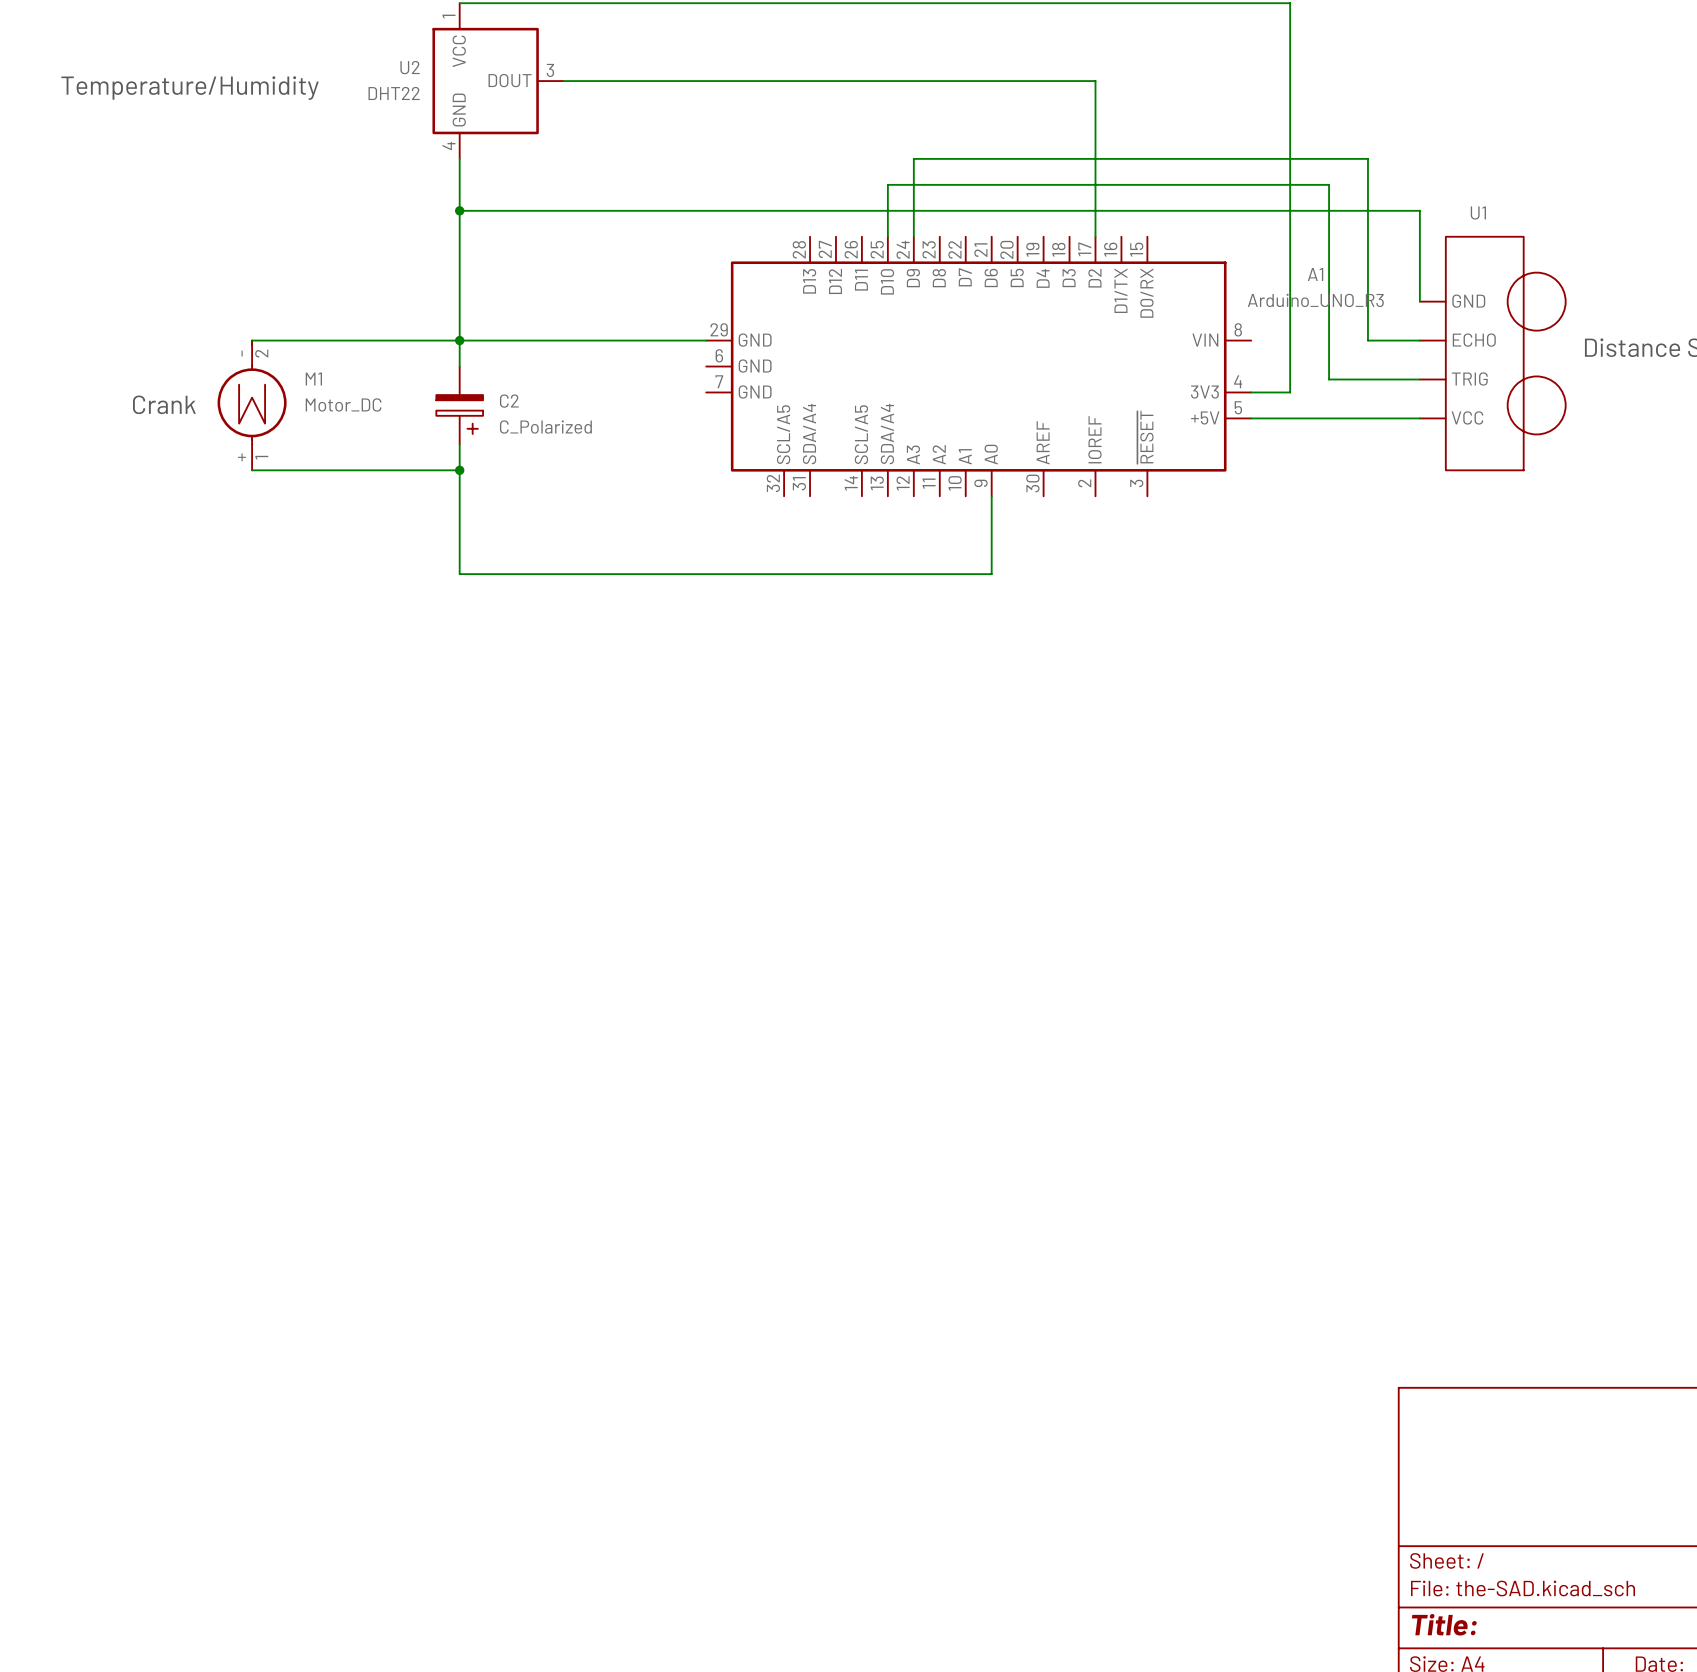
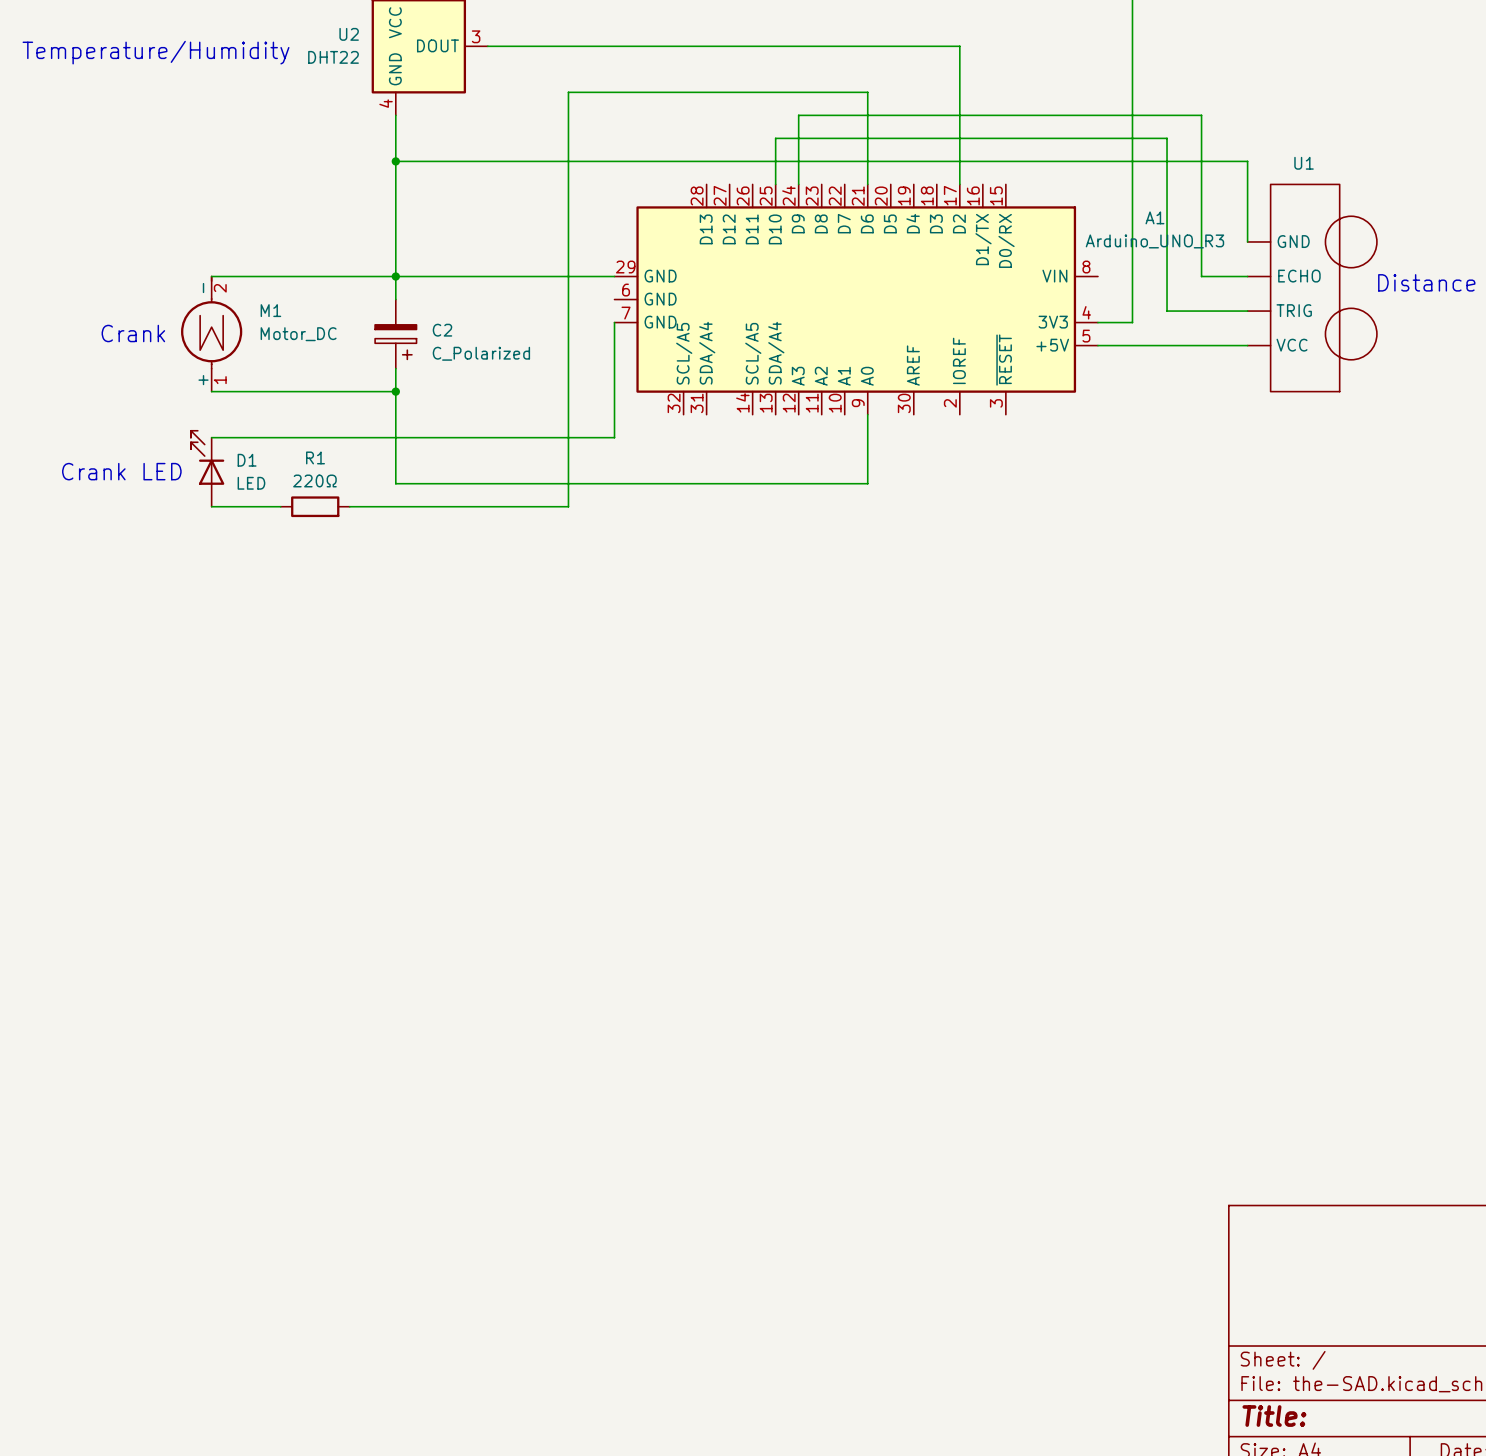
wire: none -> (867, 184) (867, 92) (568, 92) (568, 506) (349, 506)
wire: none -> (614, 322) (614, 437) (211, 437)
D1: none -> LED (207, 468)
text: none -> Crank LED (121, 471)
wire: none -> (211, 506) (280, 506)
R1: none -> 220Ω (315, 506)

